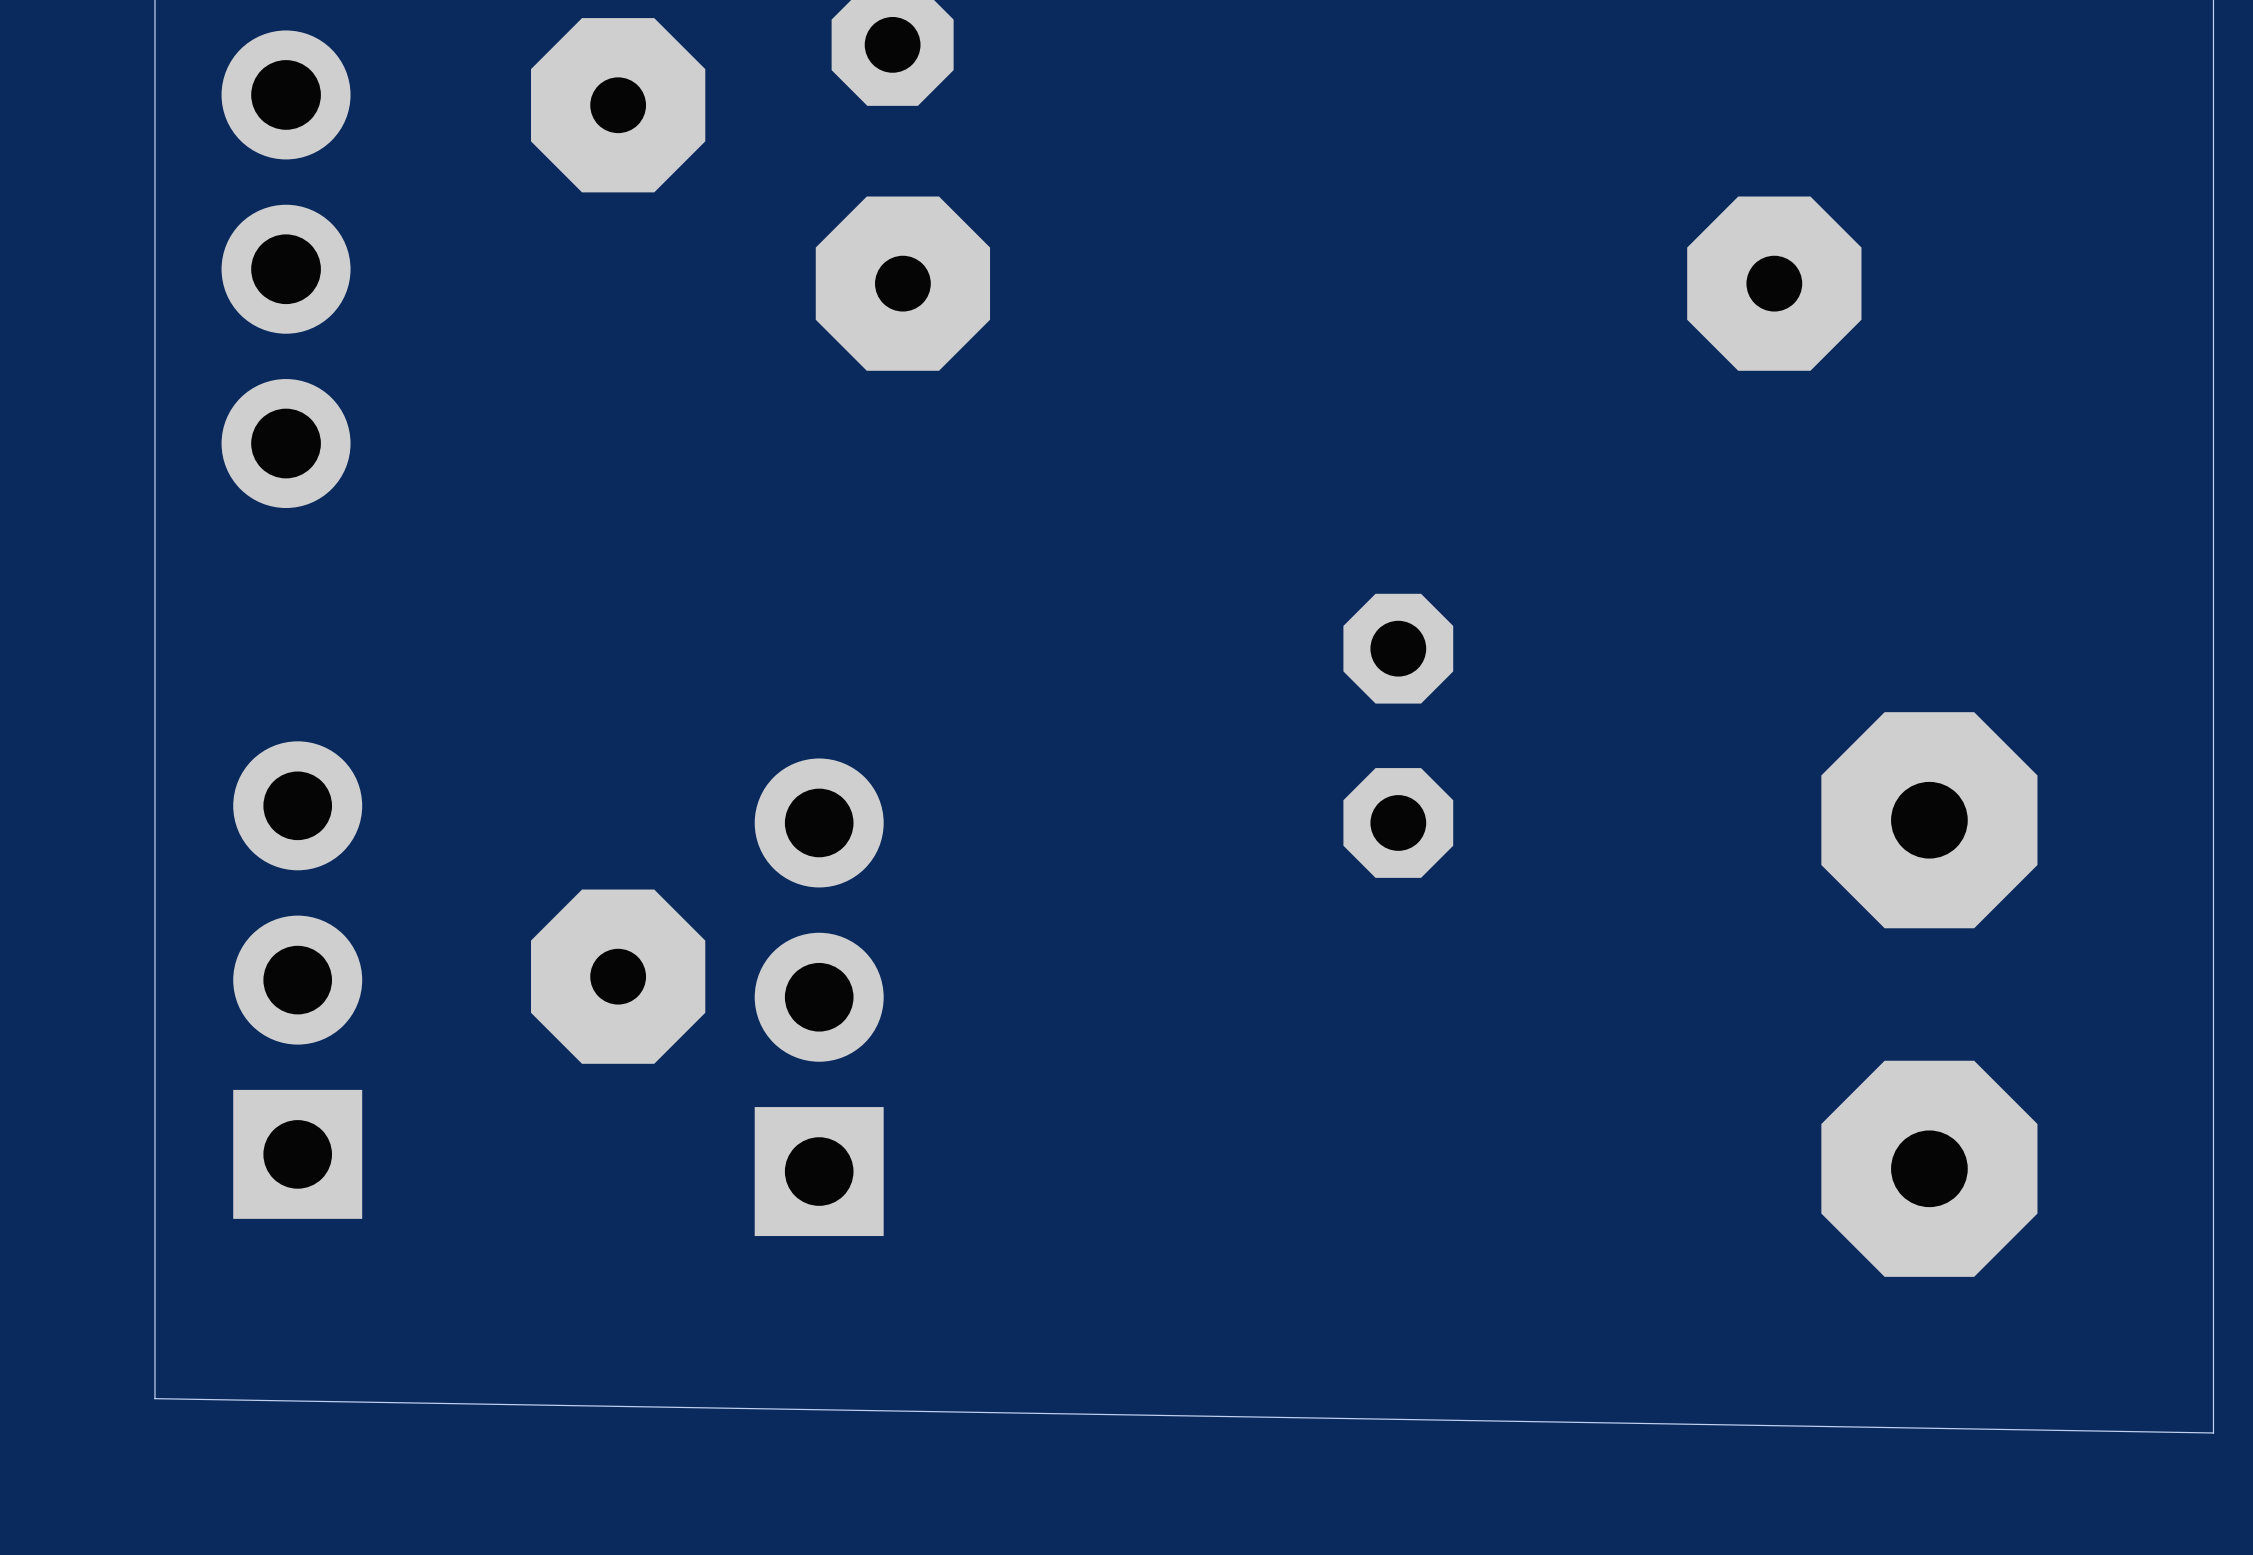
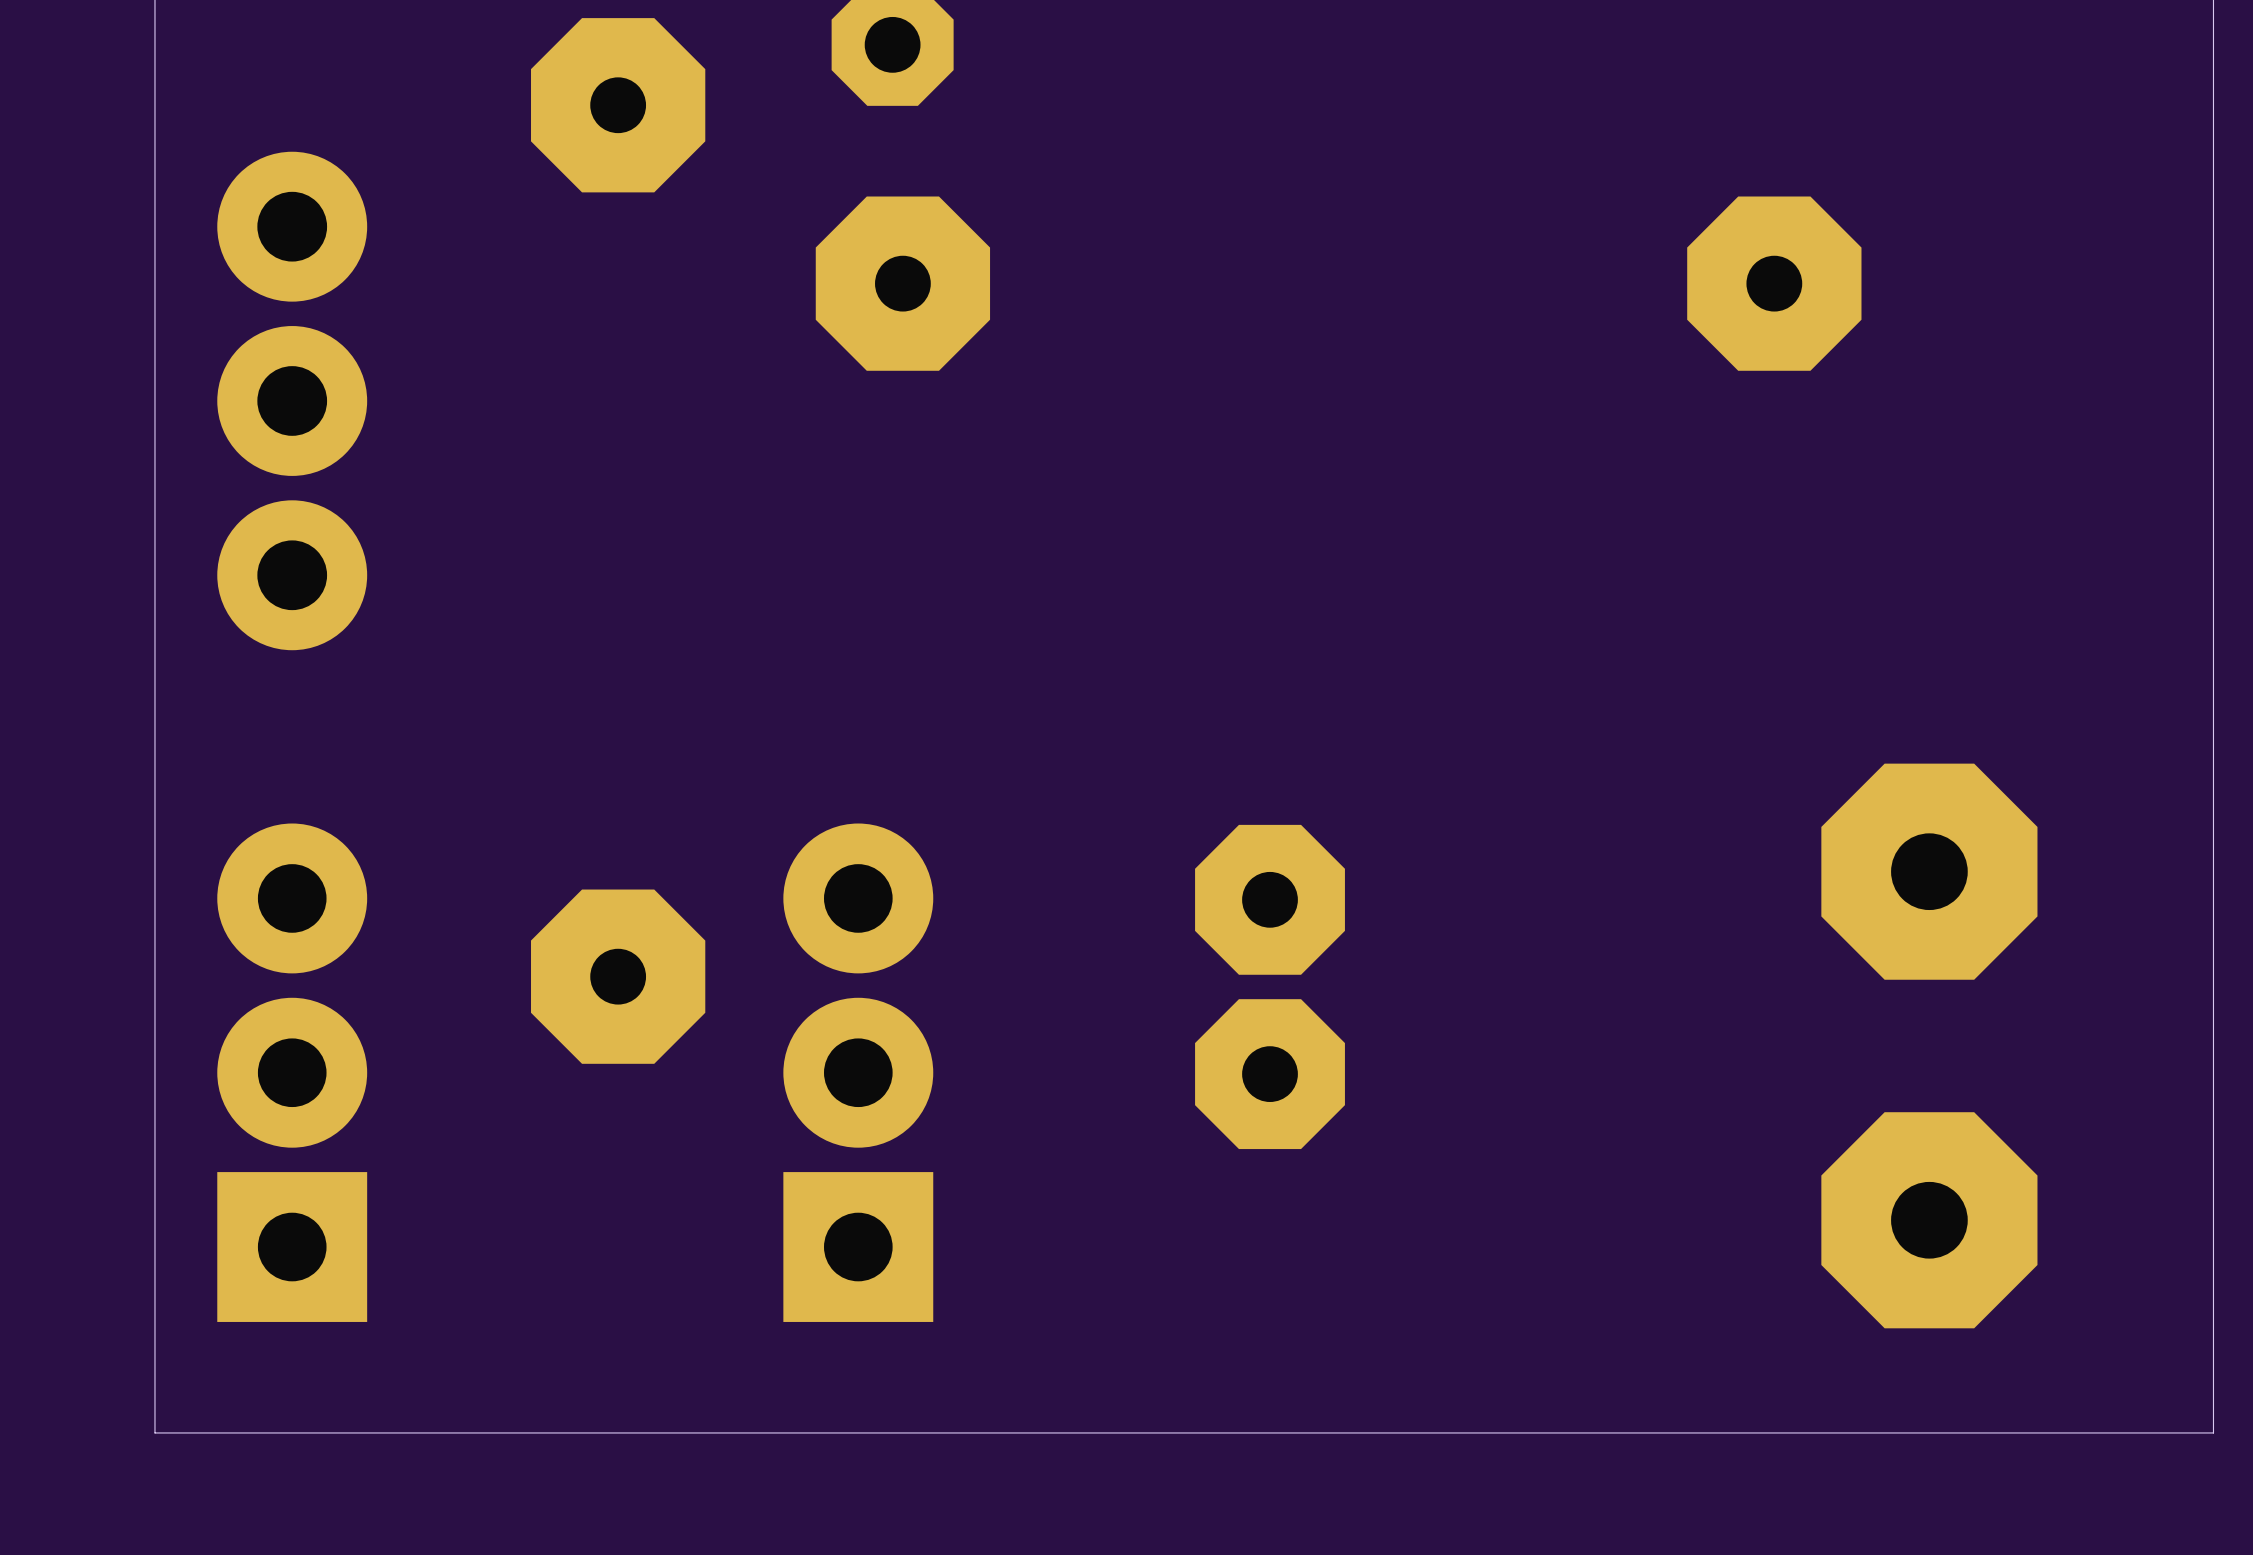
part: (286, 269) -> none
part: none -> (292, 400)
part: (1398, 735) -> none
part: (297, 980) -> none
part: none -> (1270, 986)
part position: (1929, 994) -> (1929, 1045)
part: (819, 997) -> none
part: none -> (292, 1072)
part: none -> (858, 1072)
board edge: (154, 1398) (2213, 1432) -> (154, 1398) (154, 1432) (2213, 1432)

